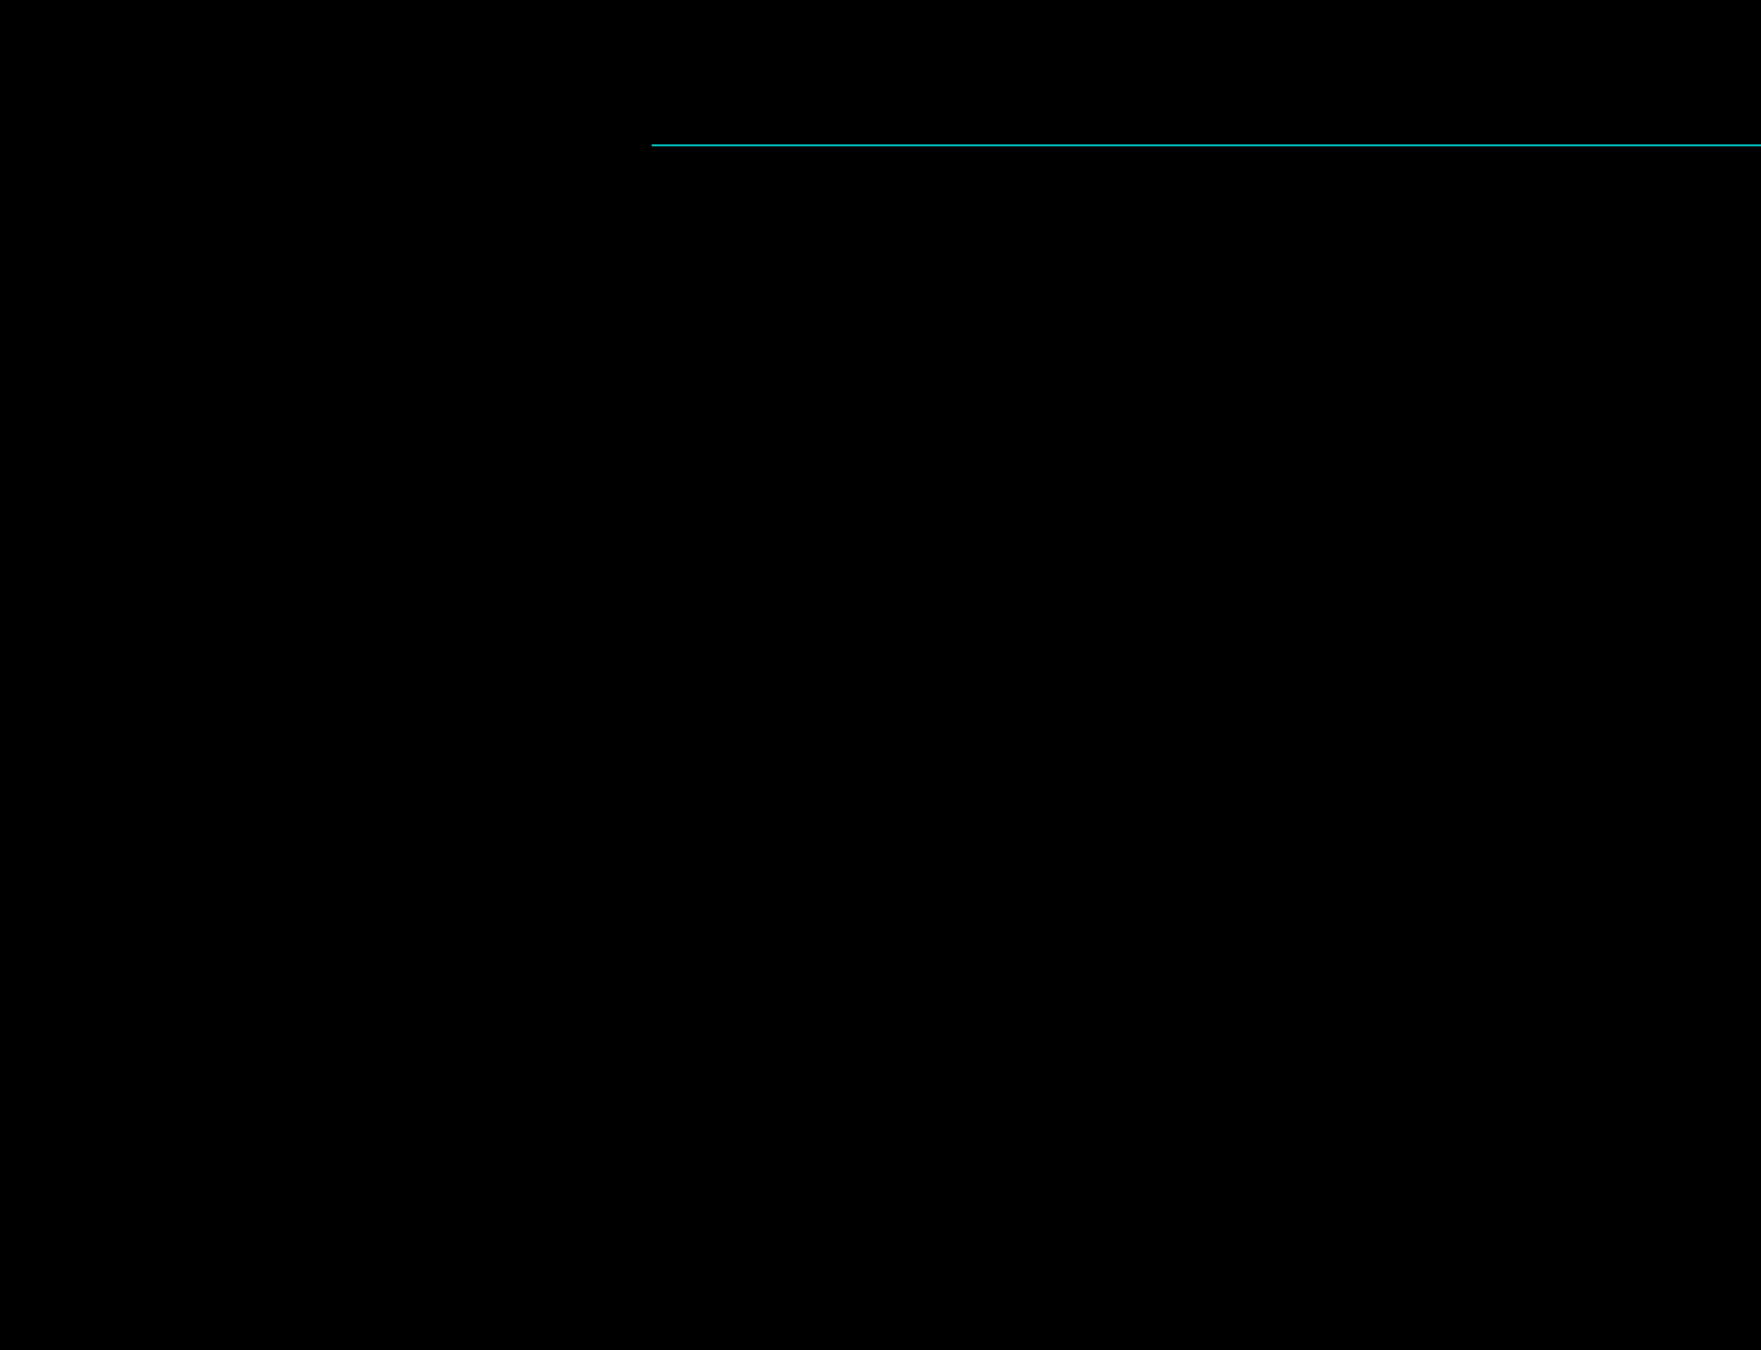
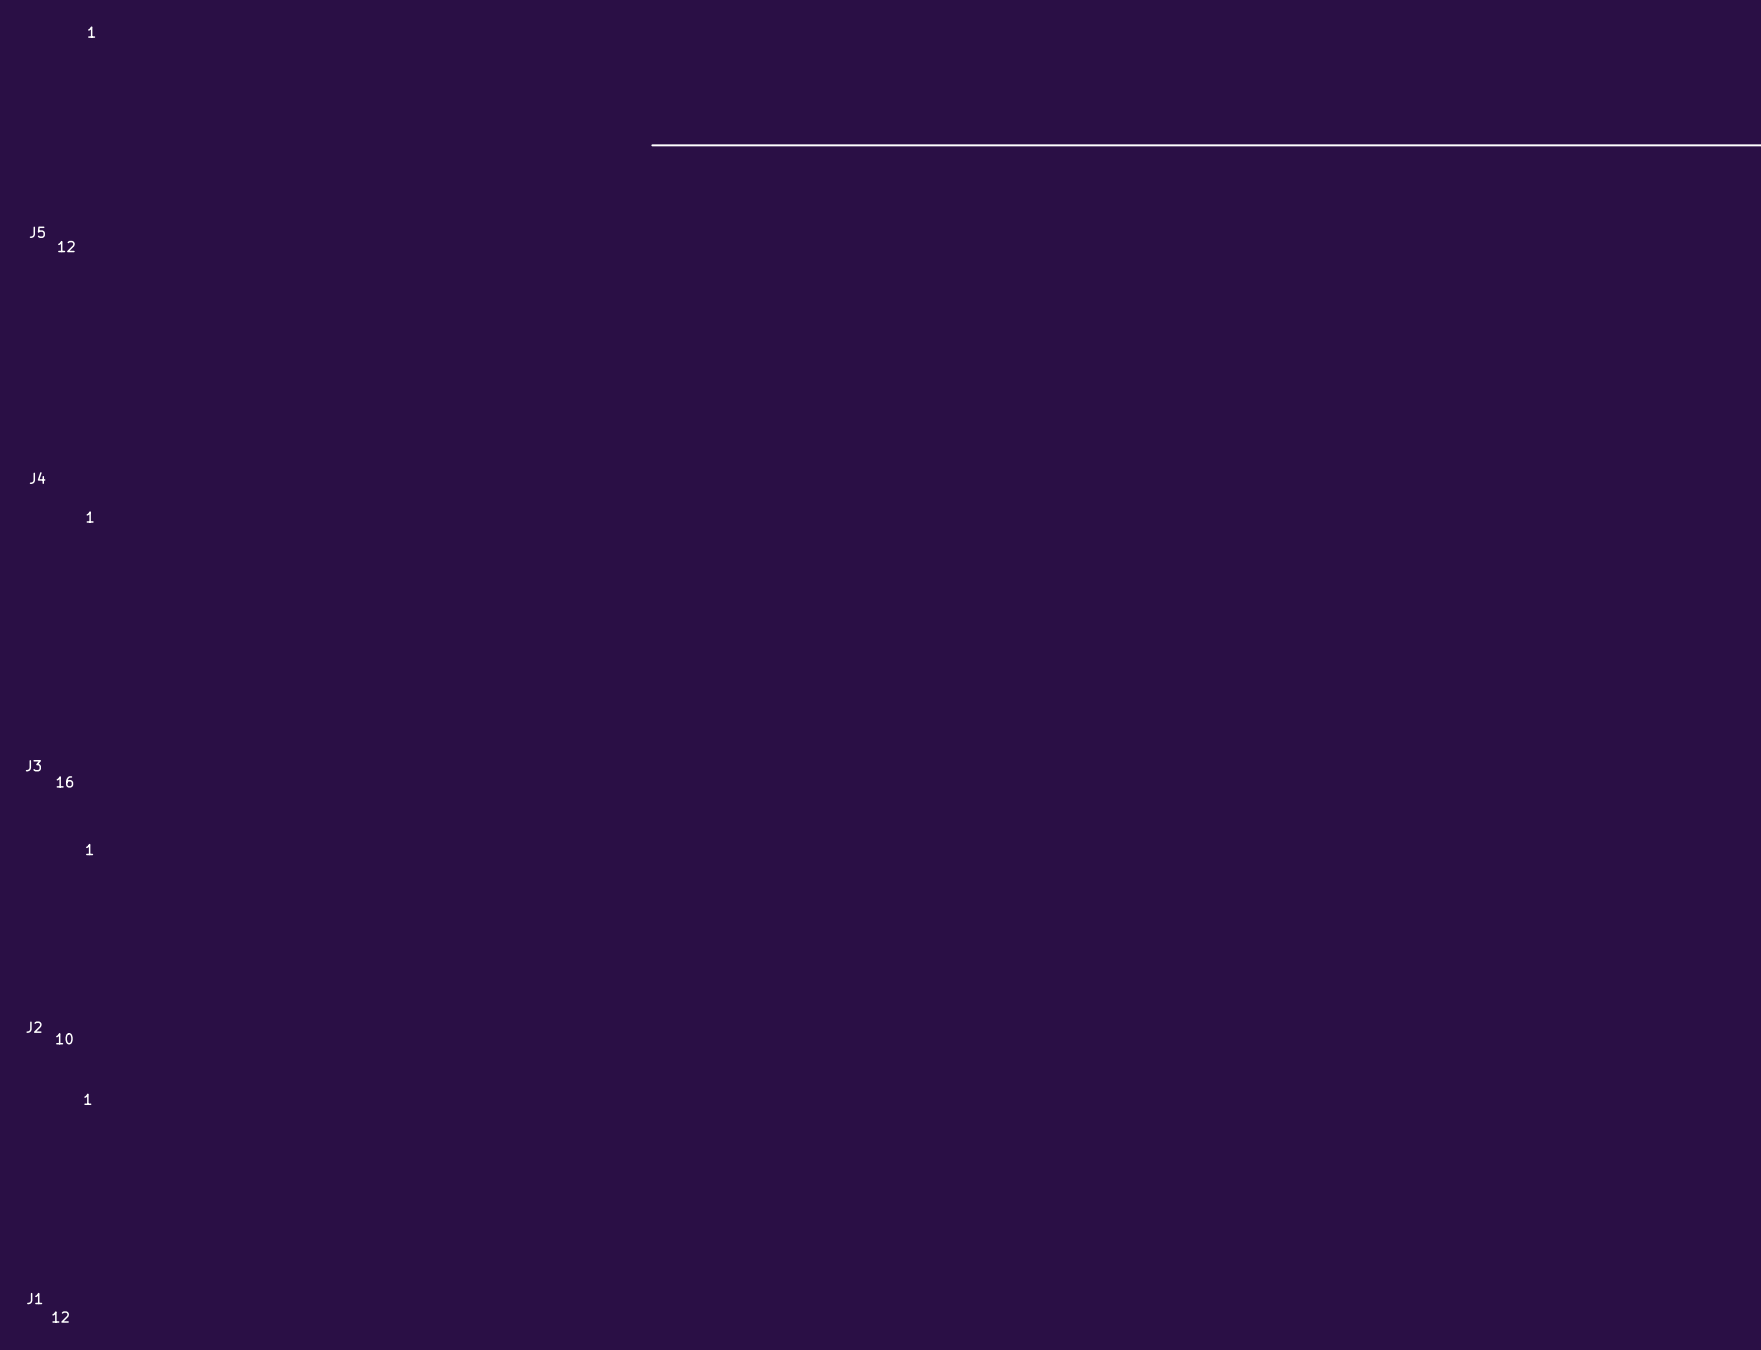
J5: none -> (62, 139)
J4: none -> (37, 478)
J3: none -> (59, 649)
J2: none -> (59, 944)
J1: none -> (59, 1208)

